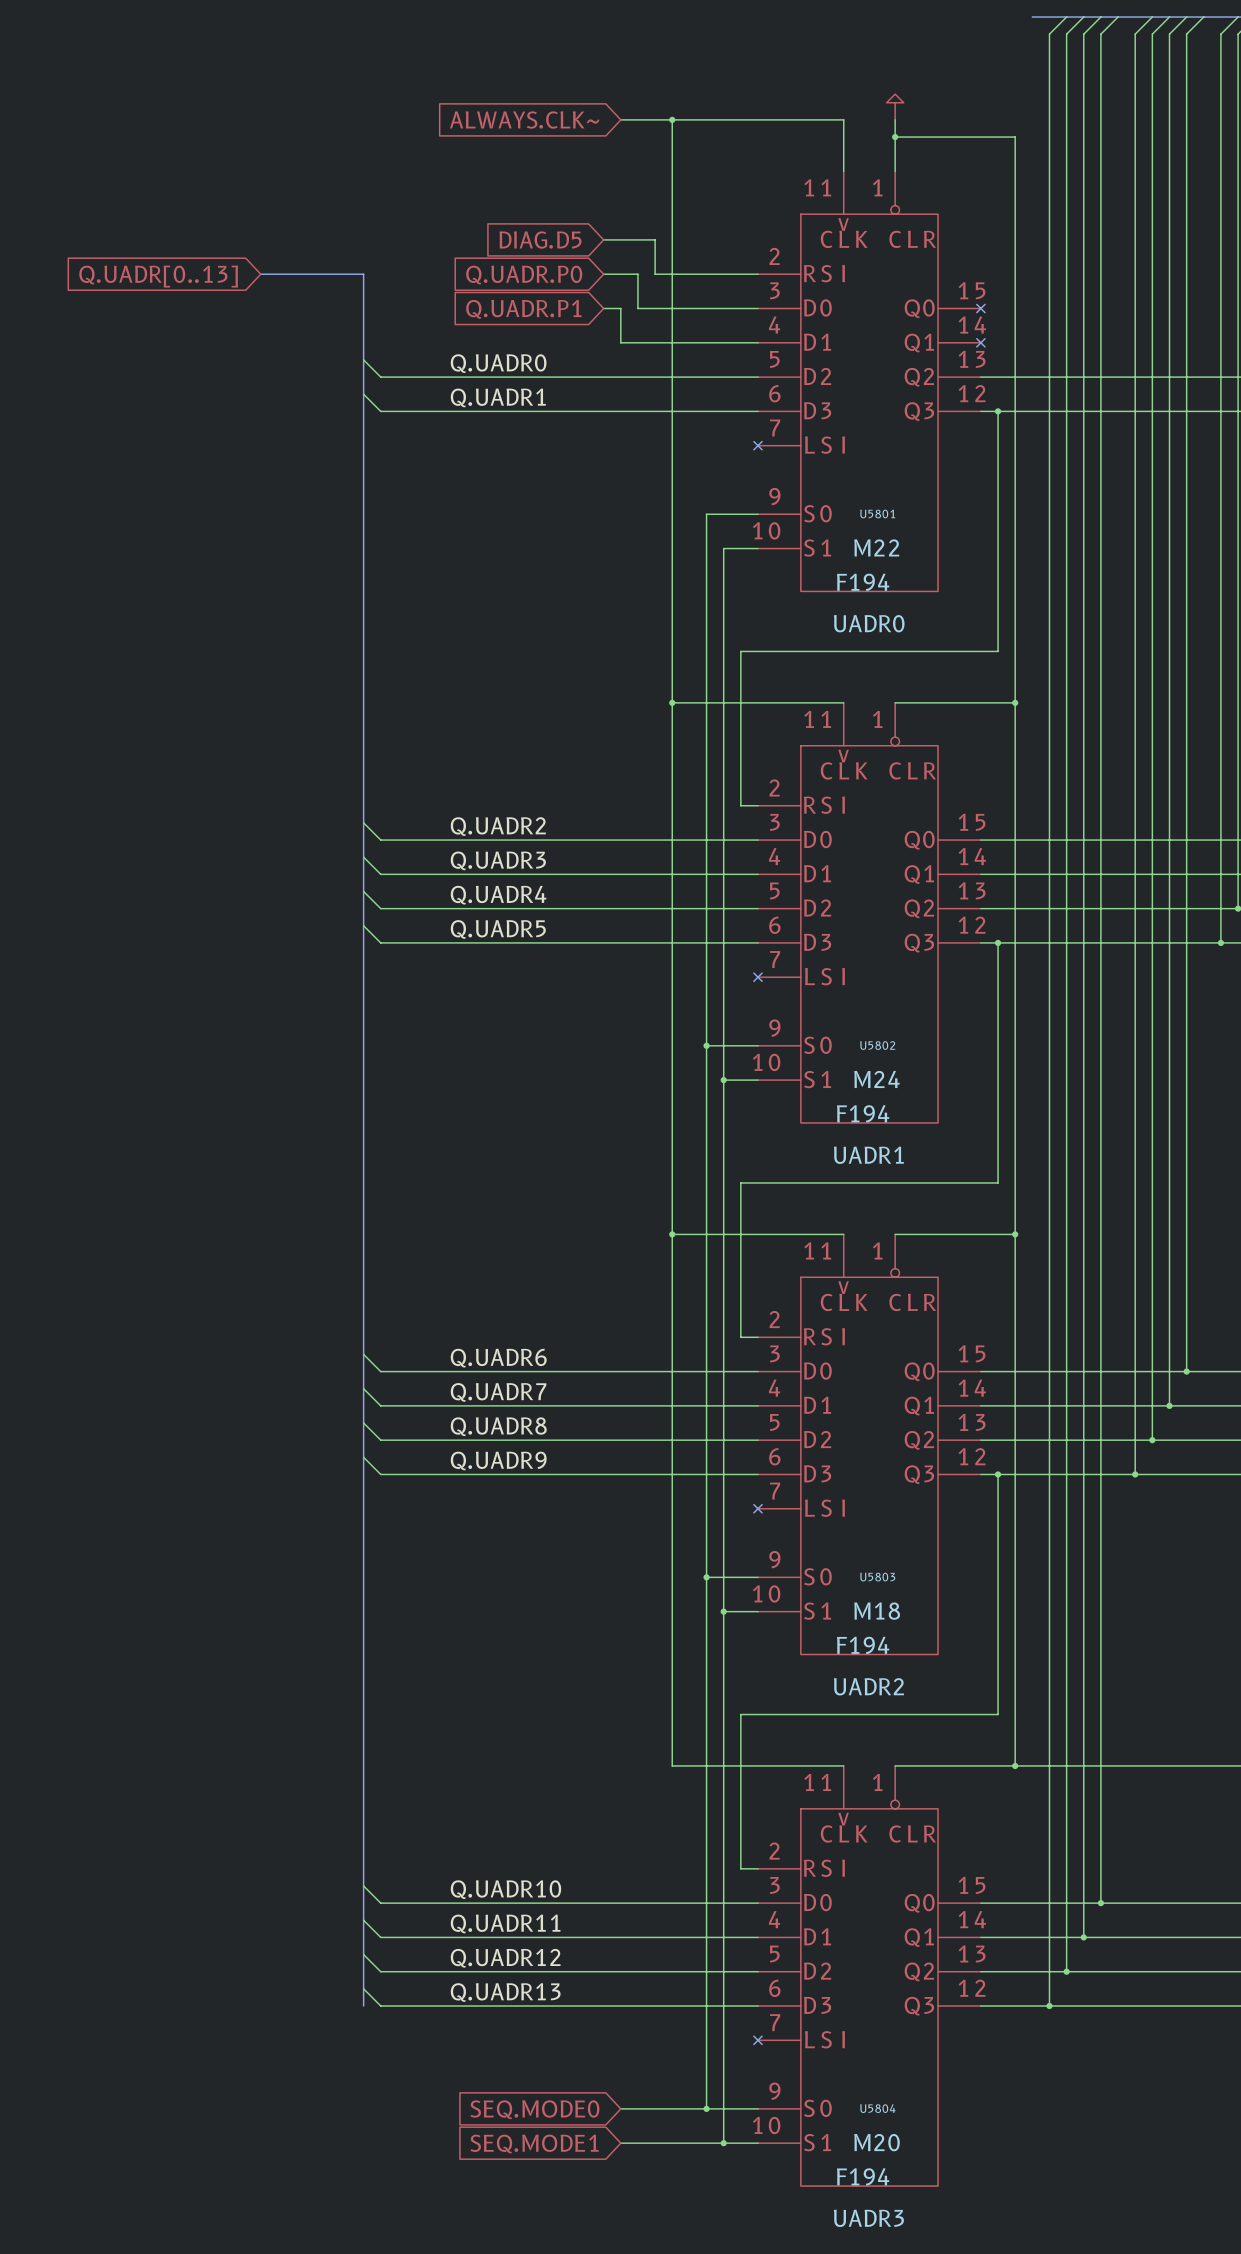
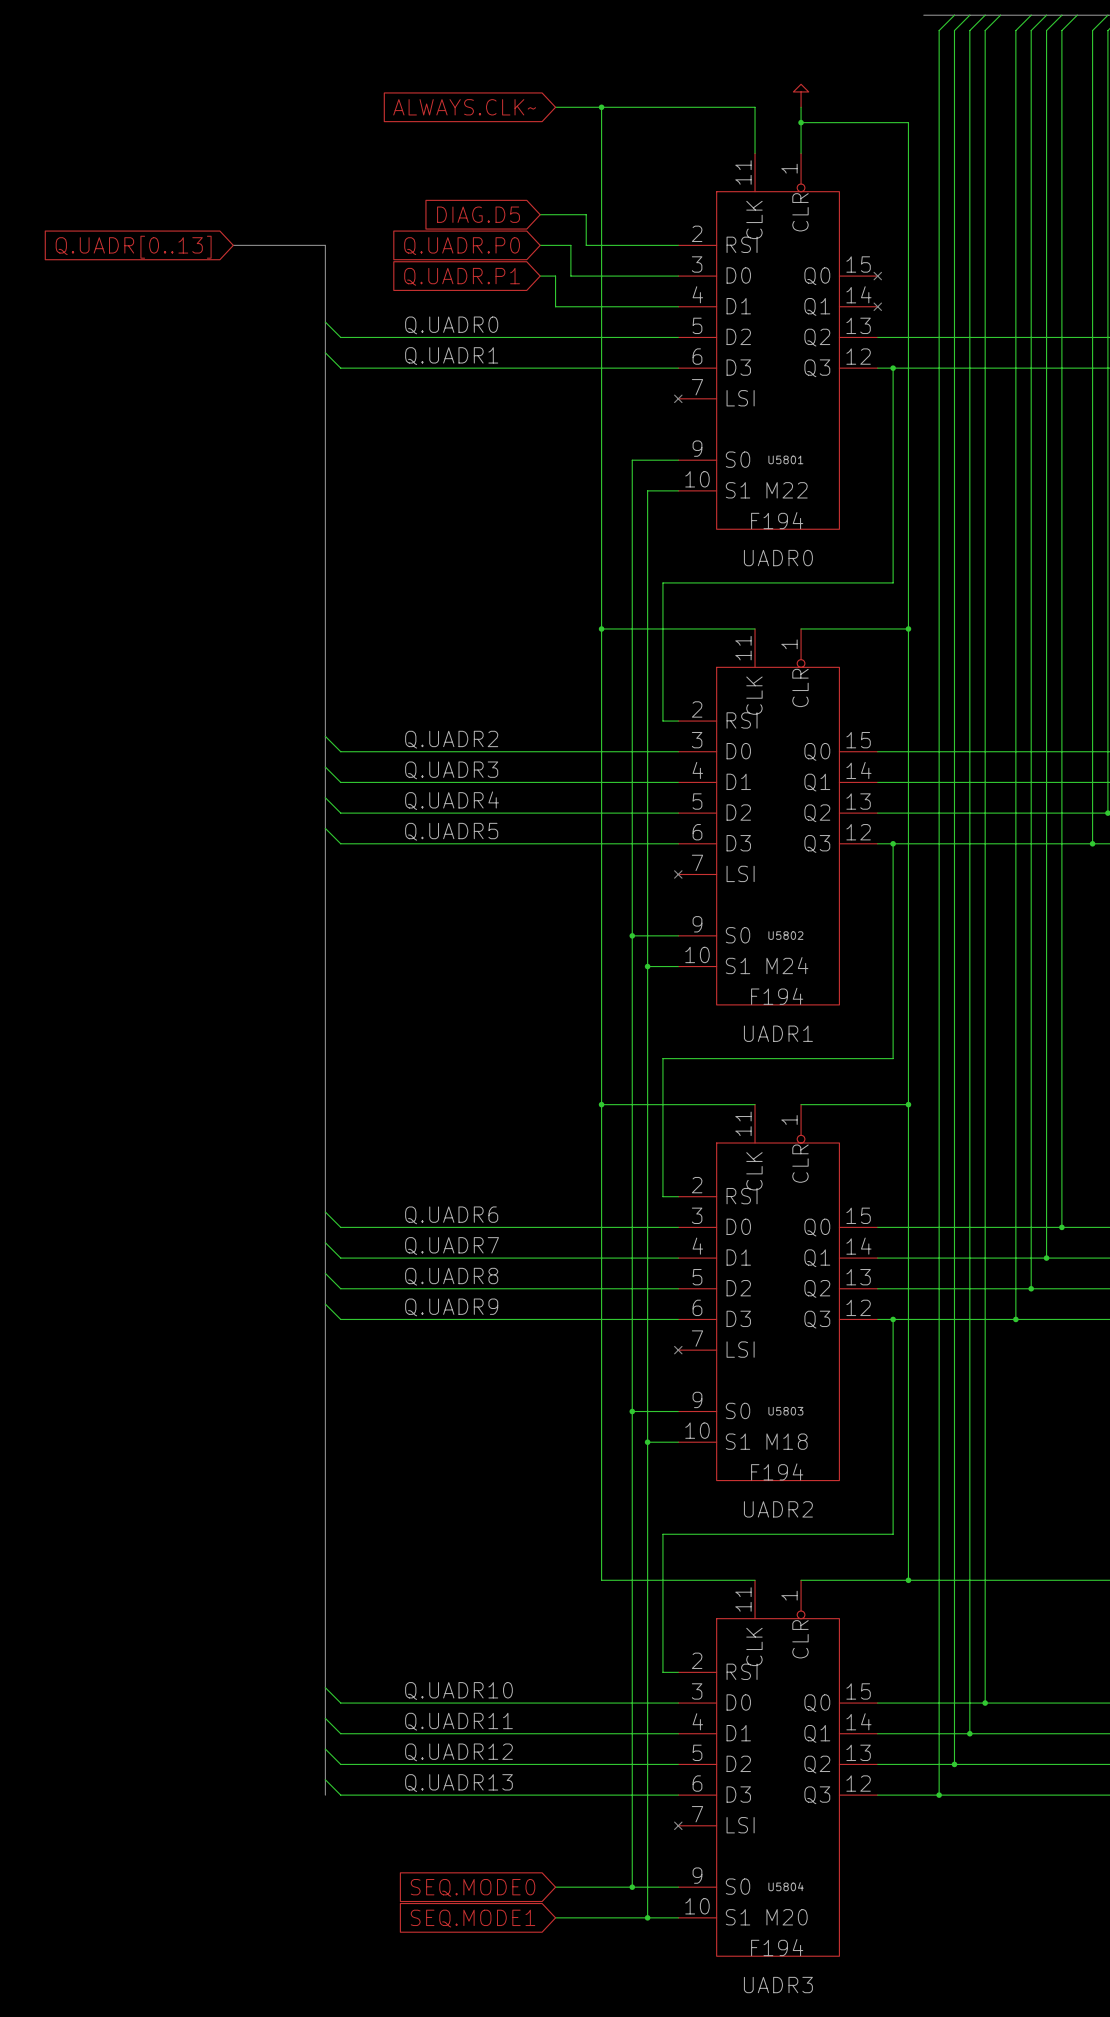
U5801 symbol: [757, 171, 981, 592] -> [678, 153, 878, 530]
U5802 symbol: [757, 702, 981, 1123] -> [678, 628, 878, 1005]
U5803 symbol: [757, 1234, 981, 1655] -> [678, 1104, 878, 1481]
U5804 symbol: [757, 1765, 981, 2187] -> [678, 1580, 878, 1957]

